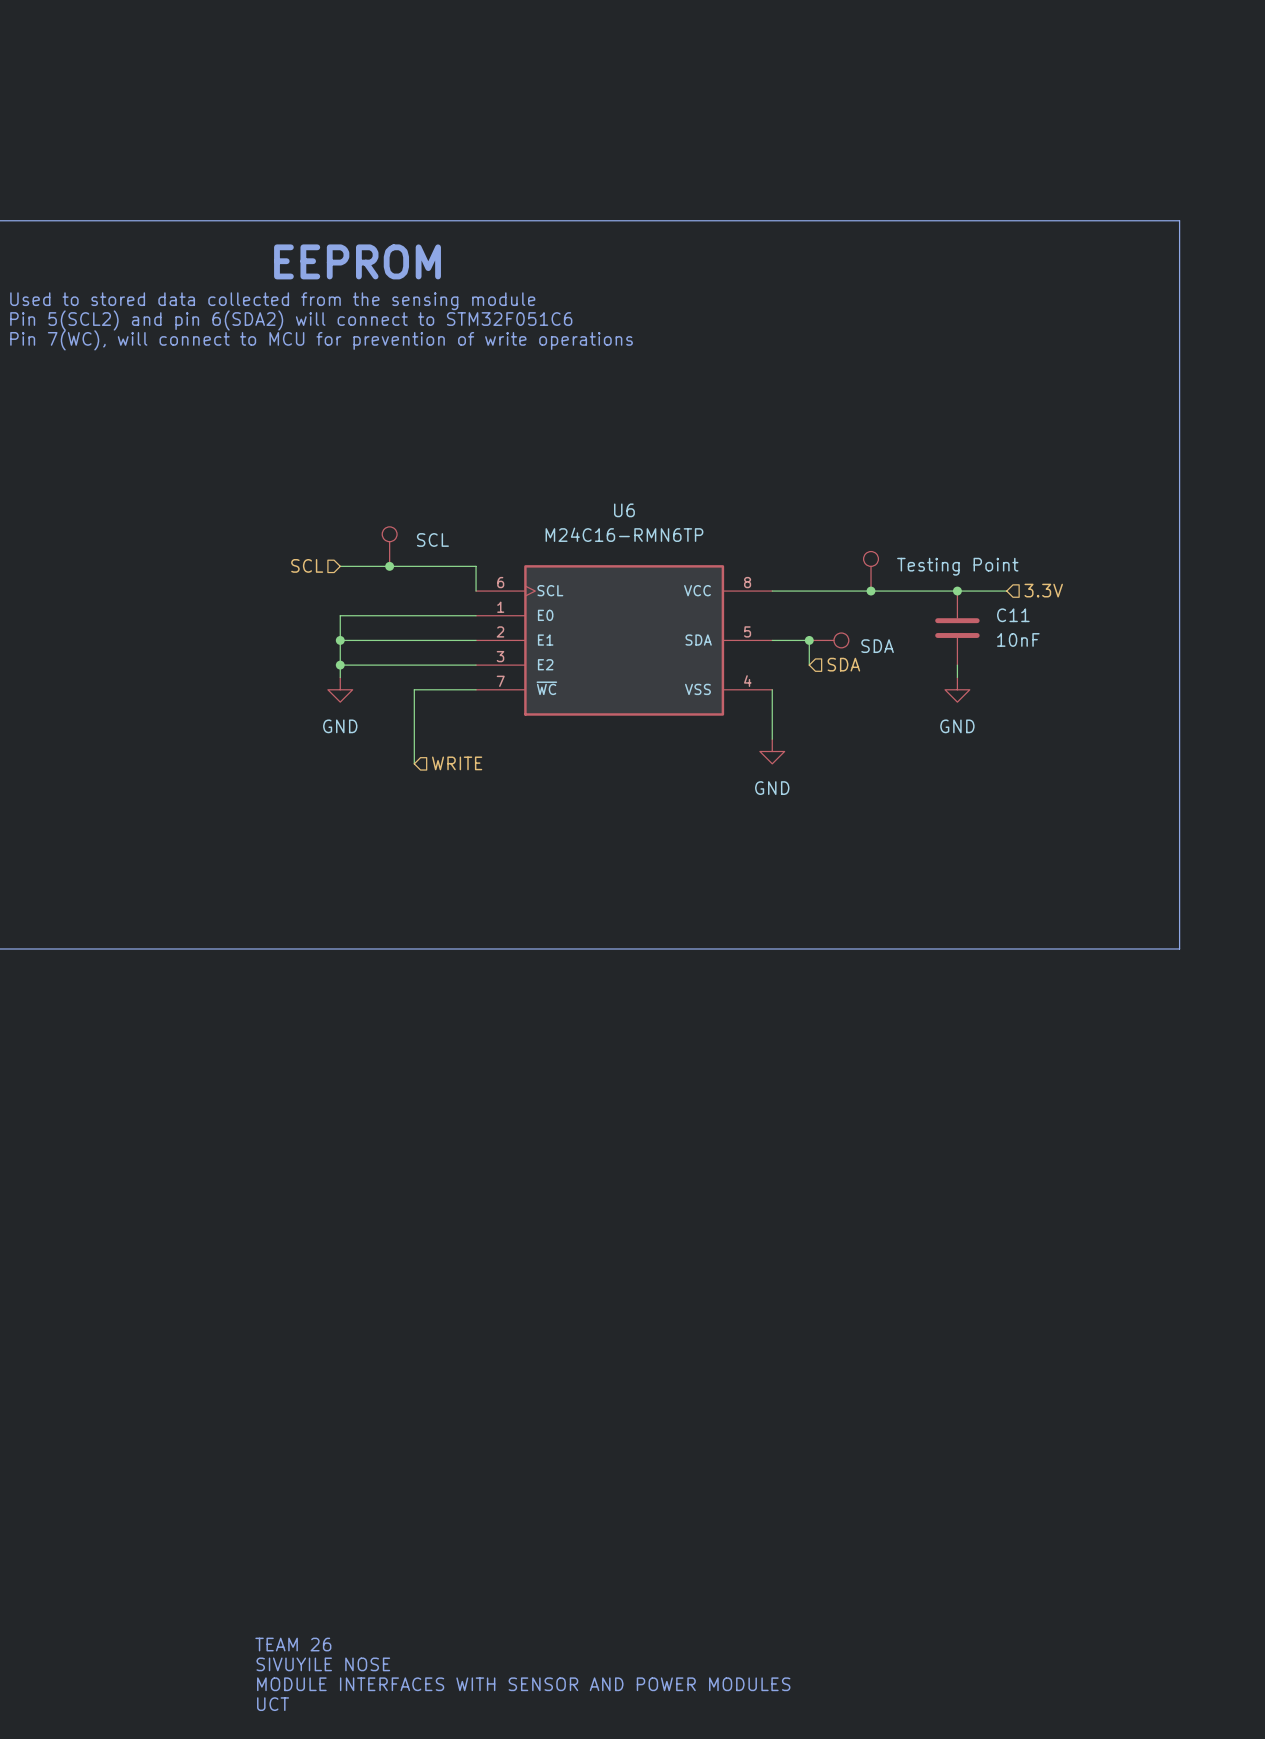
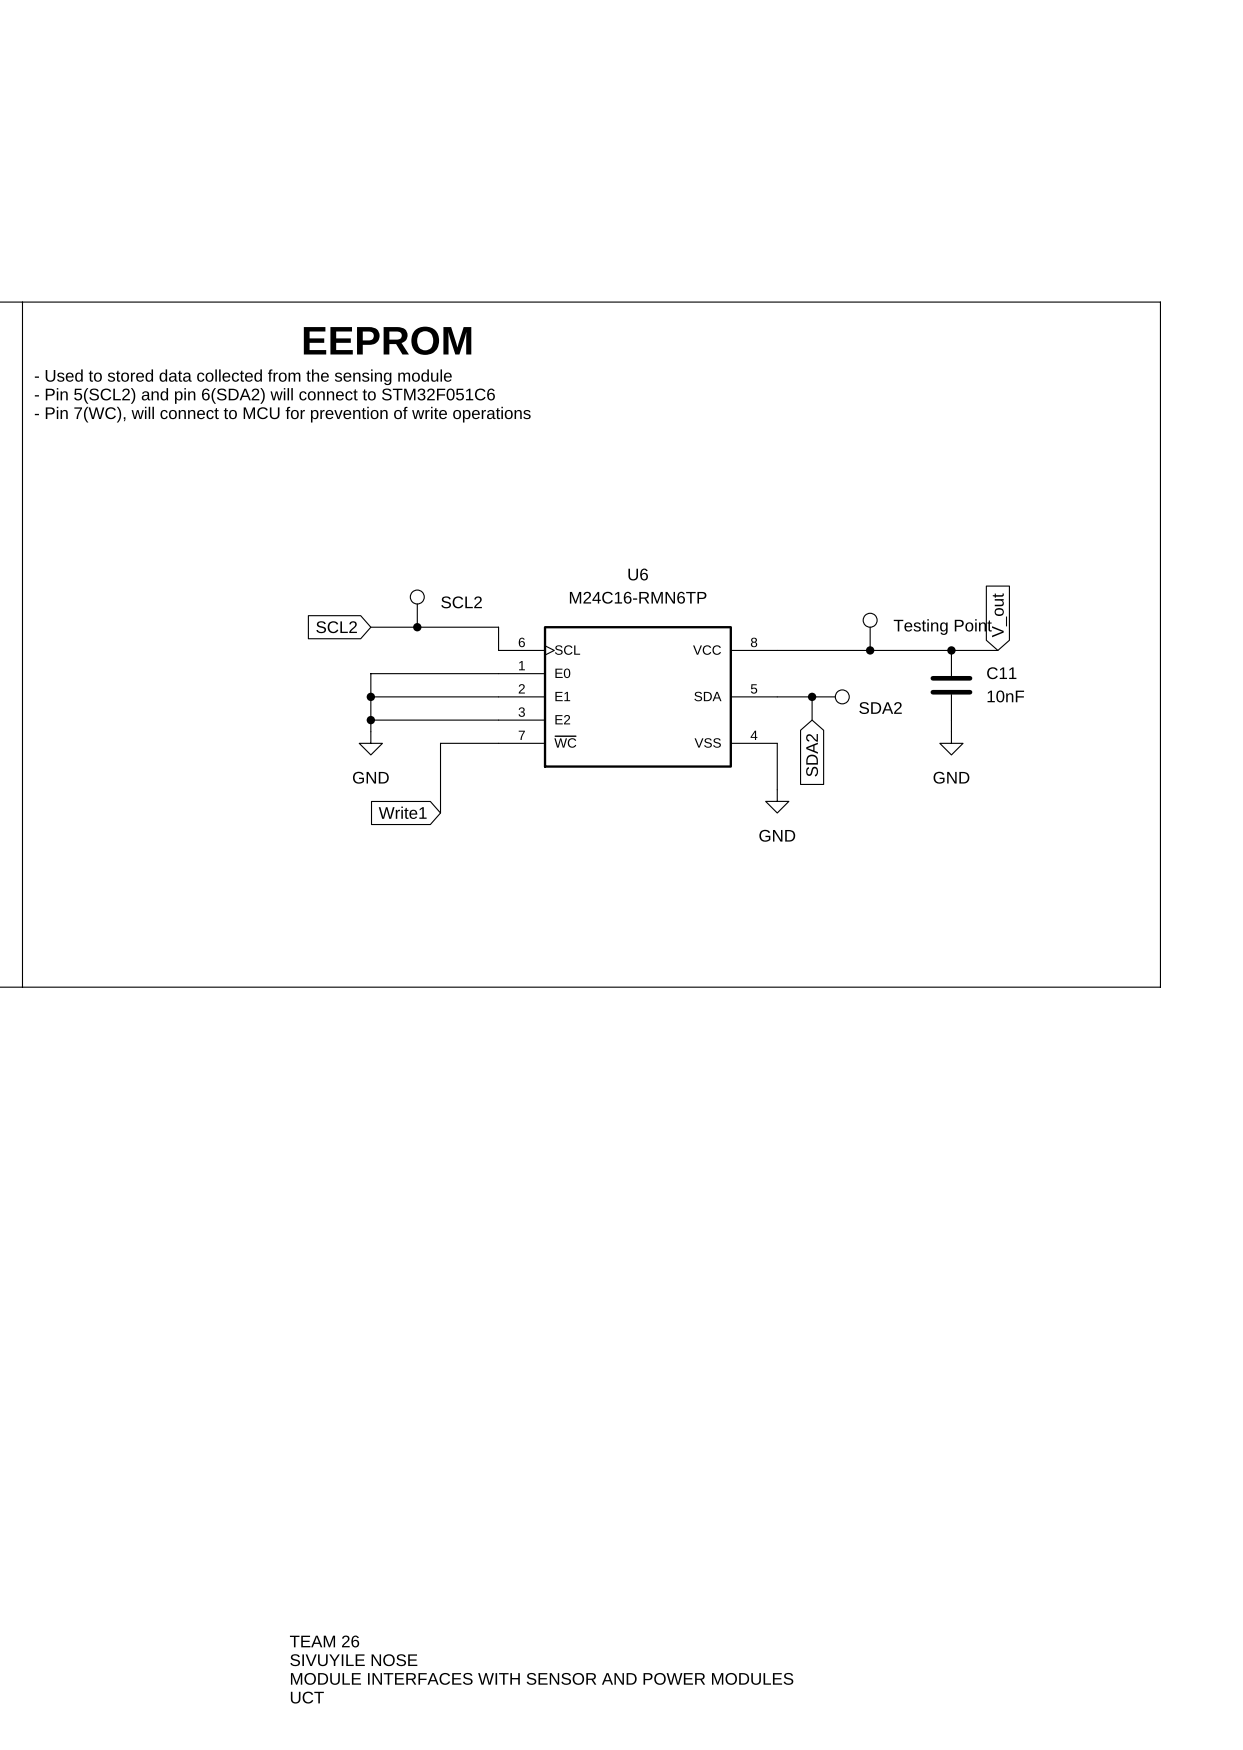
part value: SCL (432, 539) -> SCL2 (461, 602)
global label: none -> V_out (999, 615)
hierarchical label: SCL (307, 565) -> none
global label: none -> SCL2 (336, 627)
hierarchical label: 3.3V (1043, 590) -> none
part value: SDA (877, 646) -> SDA2 (880, 708)
hierarchical label: SDA (843, 664) -> none
global label: none -> SDA2 (812, 755)
global label: none -> Write1 (402, 812)
hierarchical label: WRITE (457, 763) -> none

